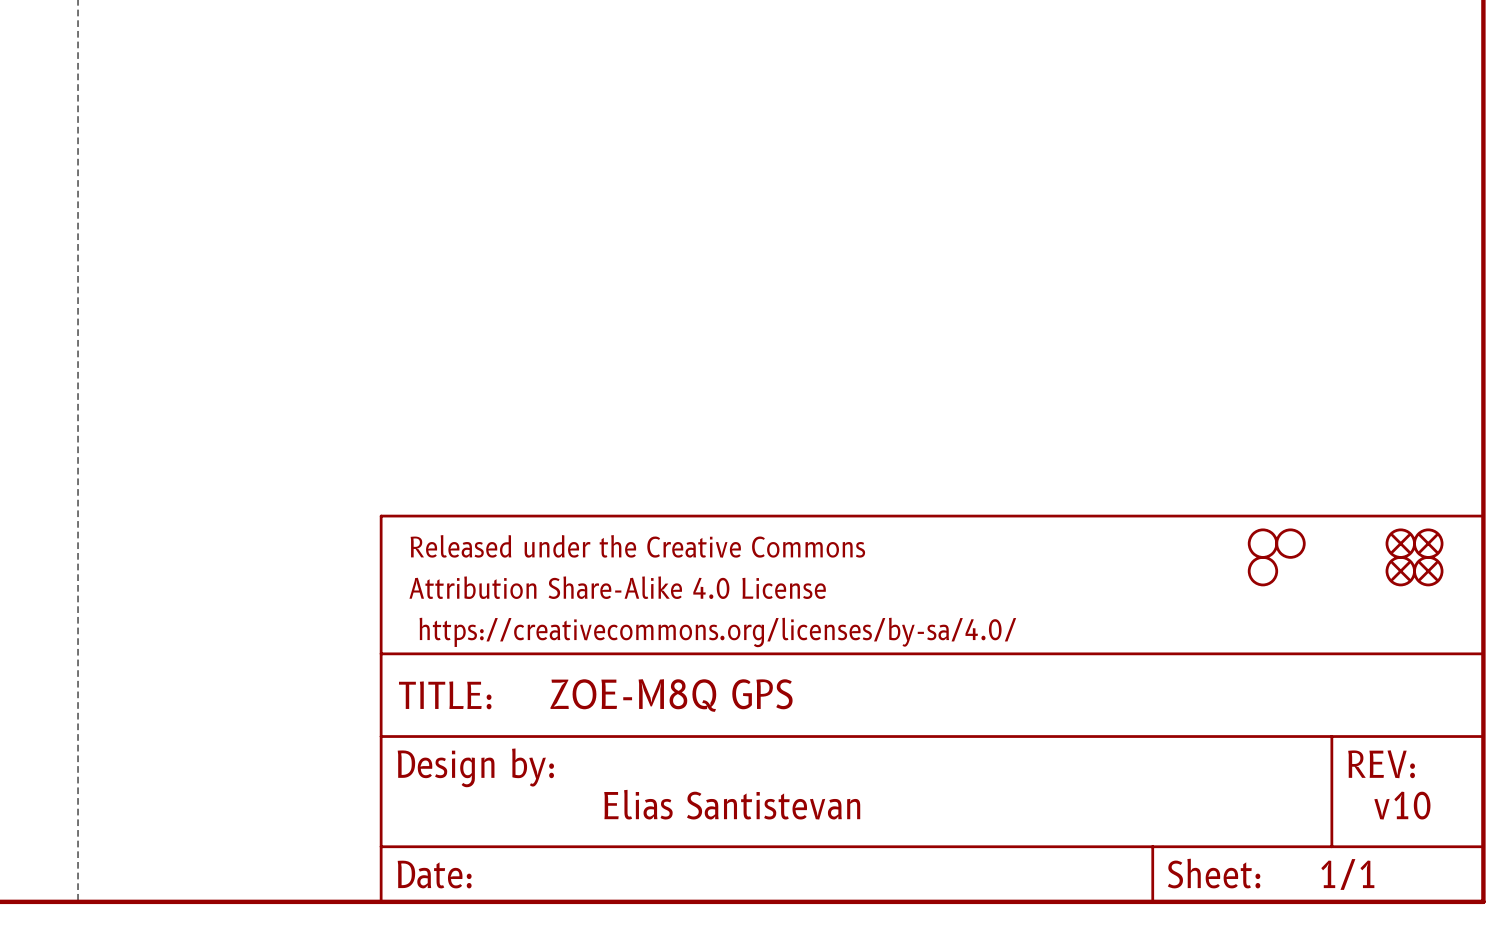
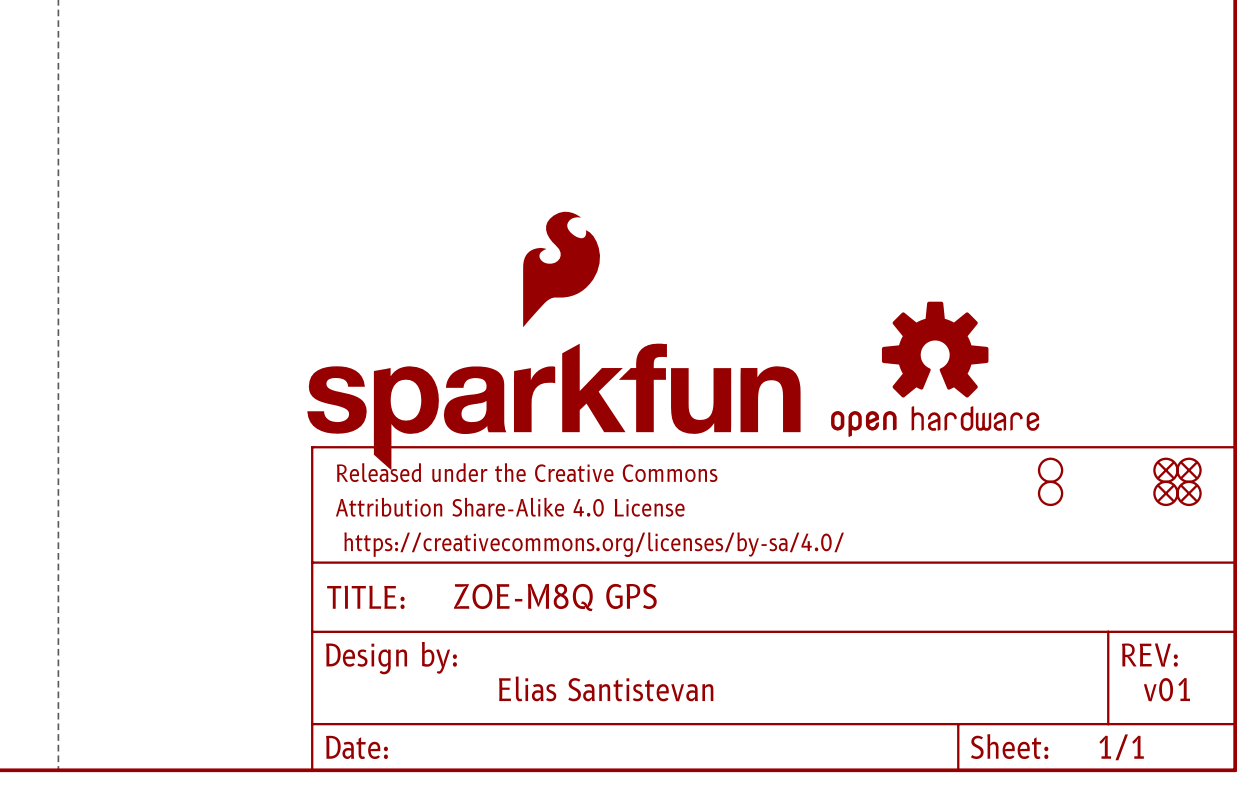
part: none -> (561, 269)
part: none -> (935, 369)
part: none -> (553, 407)
part: (1290, 543) -> none
text: v10 (1402, 805) -> v01 (1166, 689)

